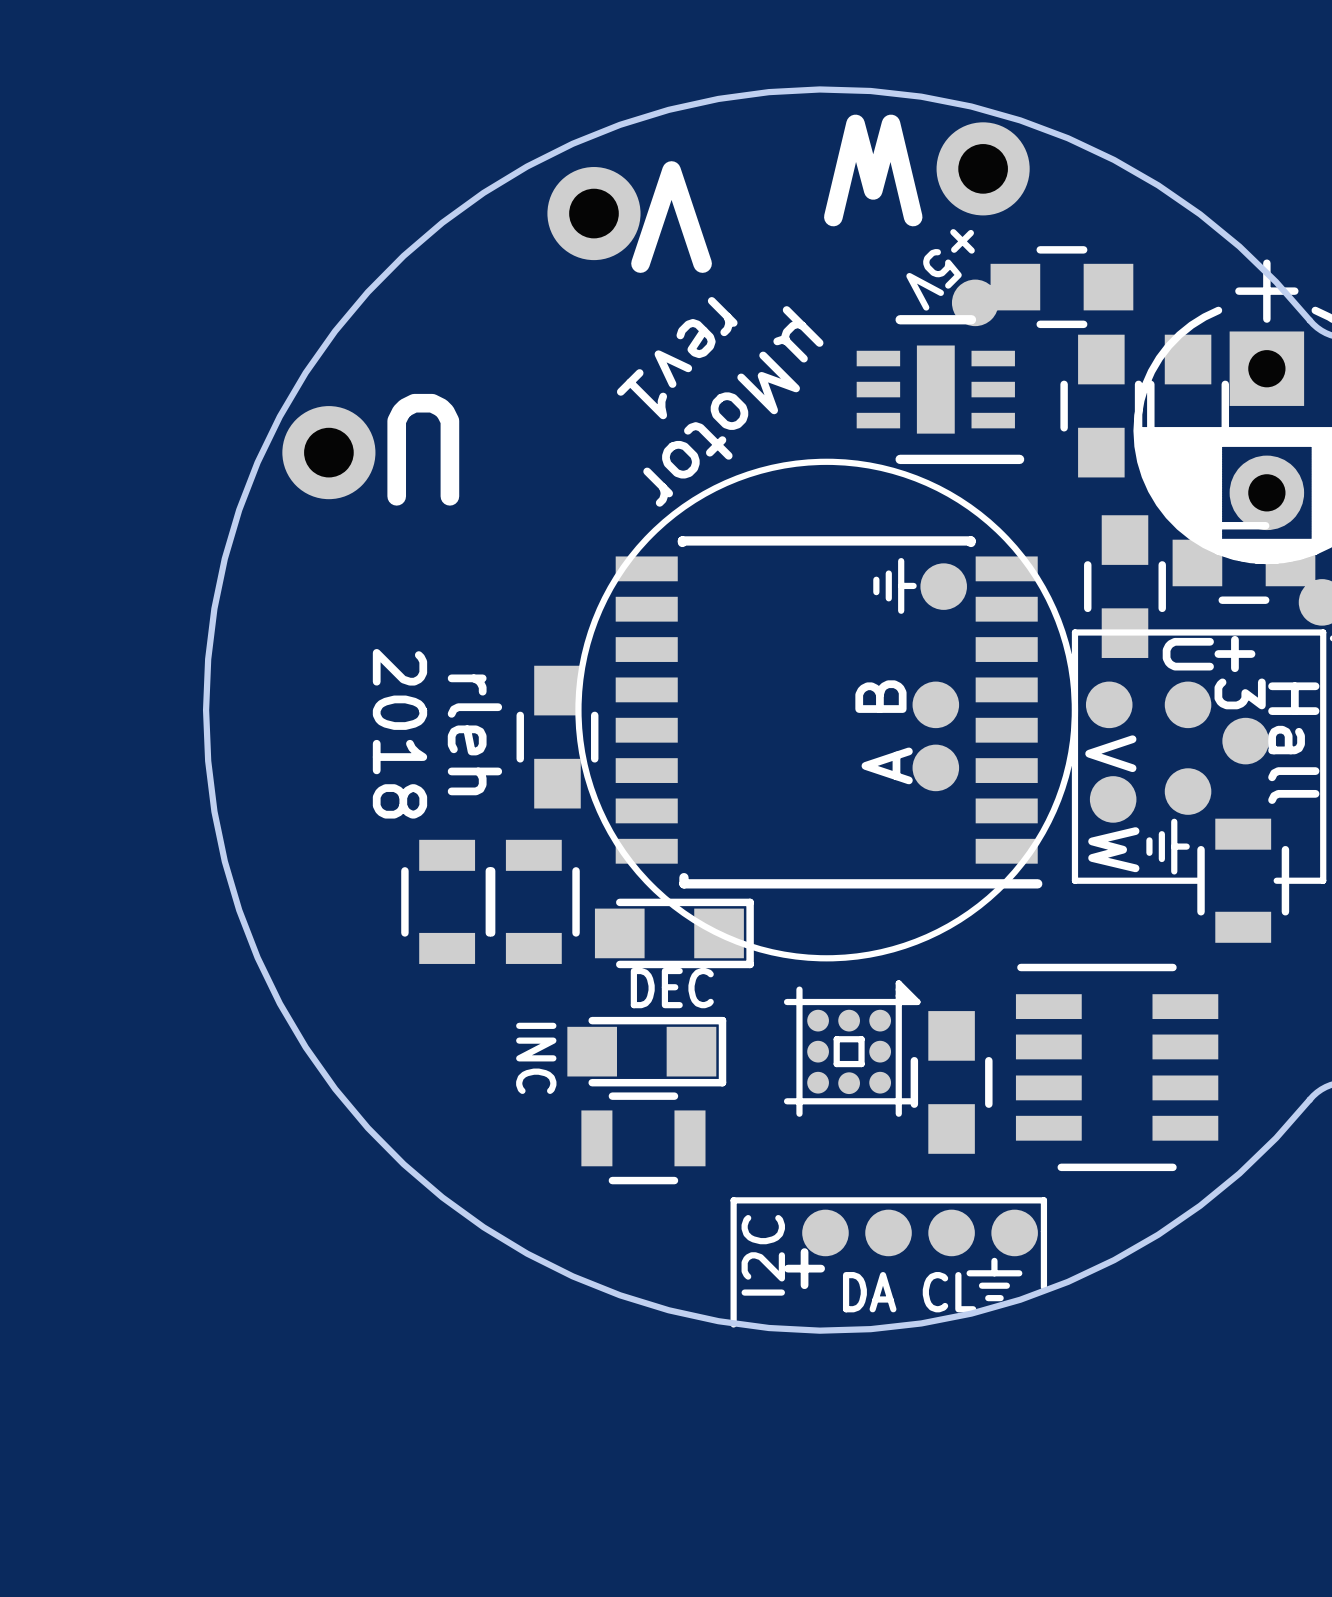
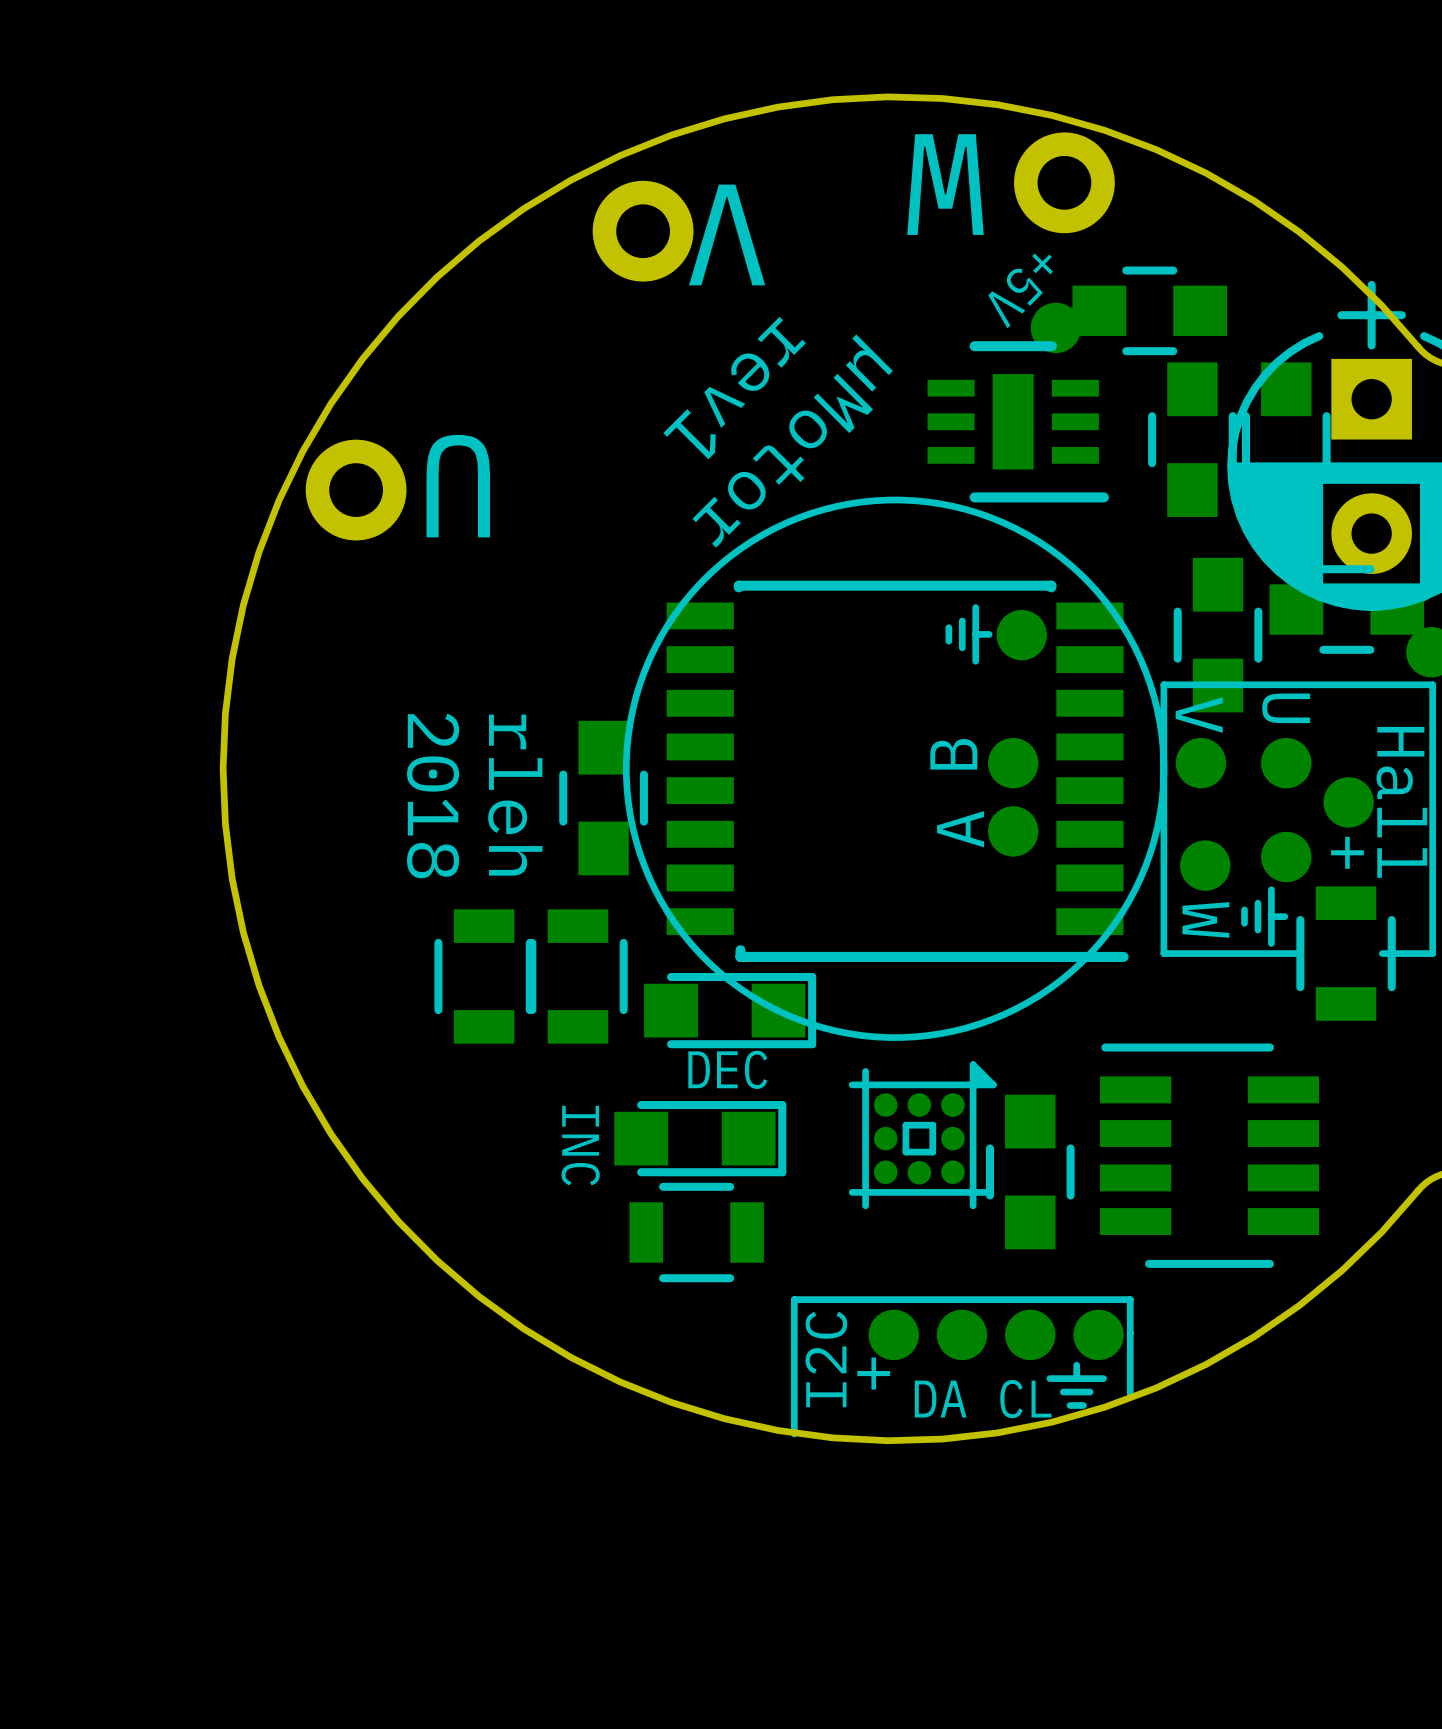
text: +3 (1240, 672) -> none
text position: V (1110, 753) -> V (1199, 715)
text: none -> + (1347, 852)

